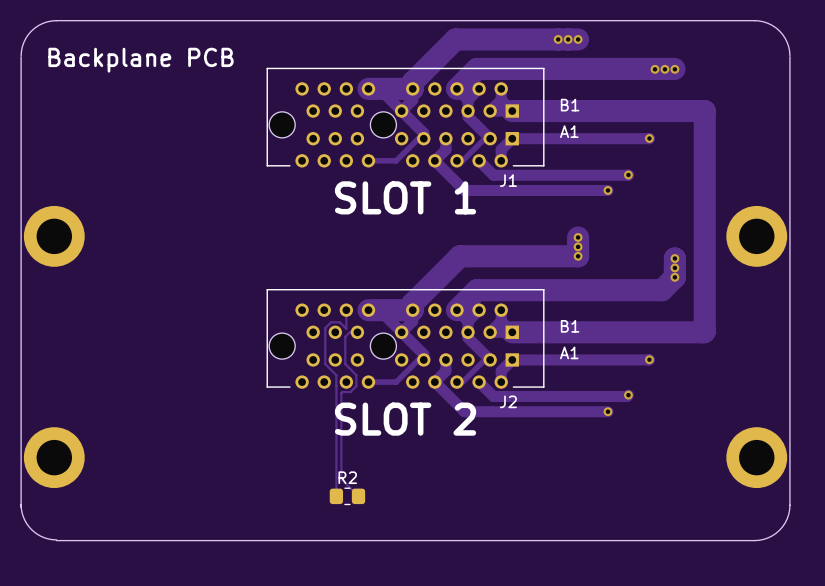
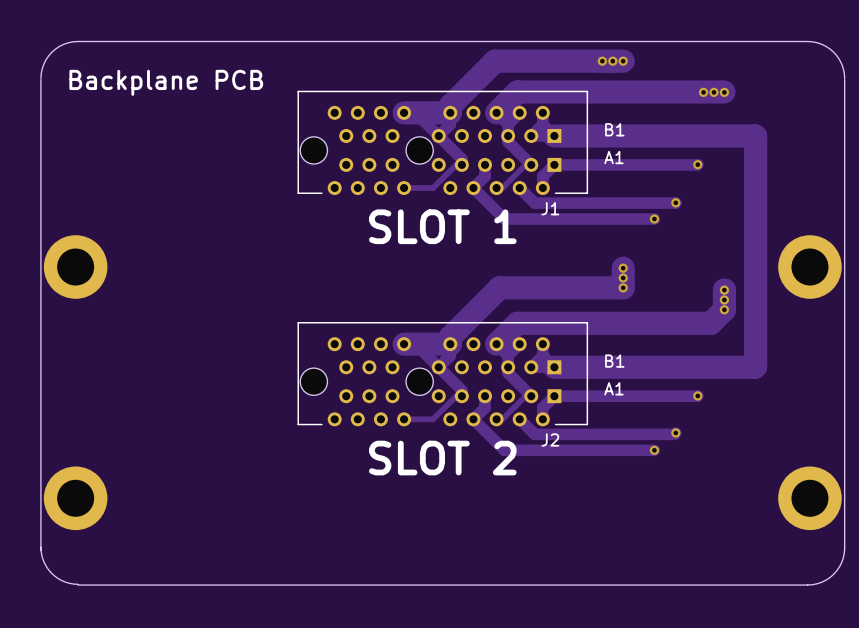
track: (346, 310) (346, 328) (339, 322) (331, 322) (325, 328) (325, 364) (336, 375) (336, 496) -> none
track: (357, 332) (349, 332) (345, 336) (345, 364) (356, 375) (356, 386) (350, 392) (341, 392) (341, 479) (358, 496) -> none
R2: (347, 496) -> none

